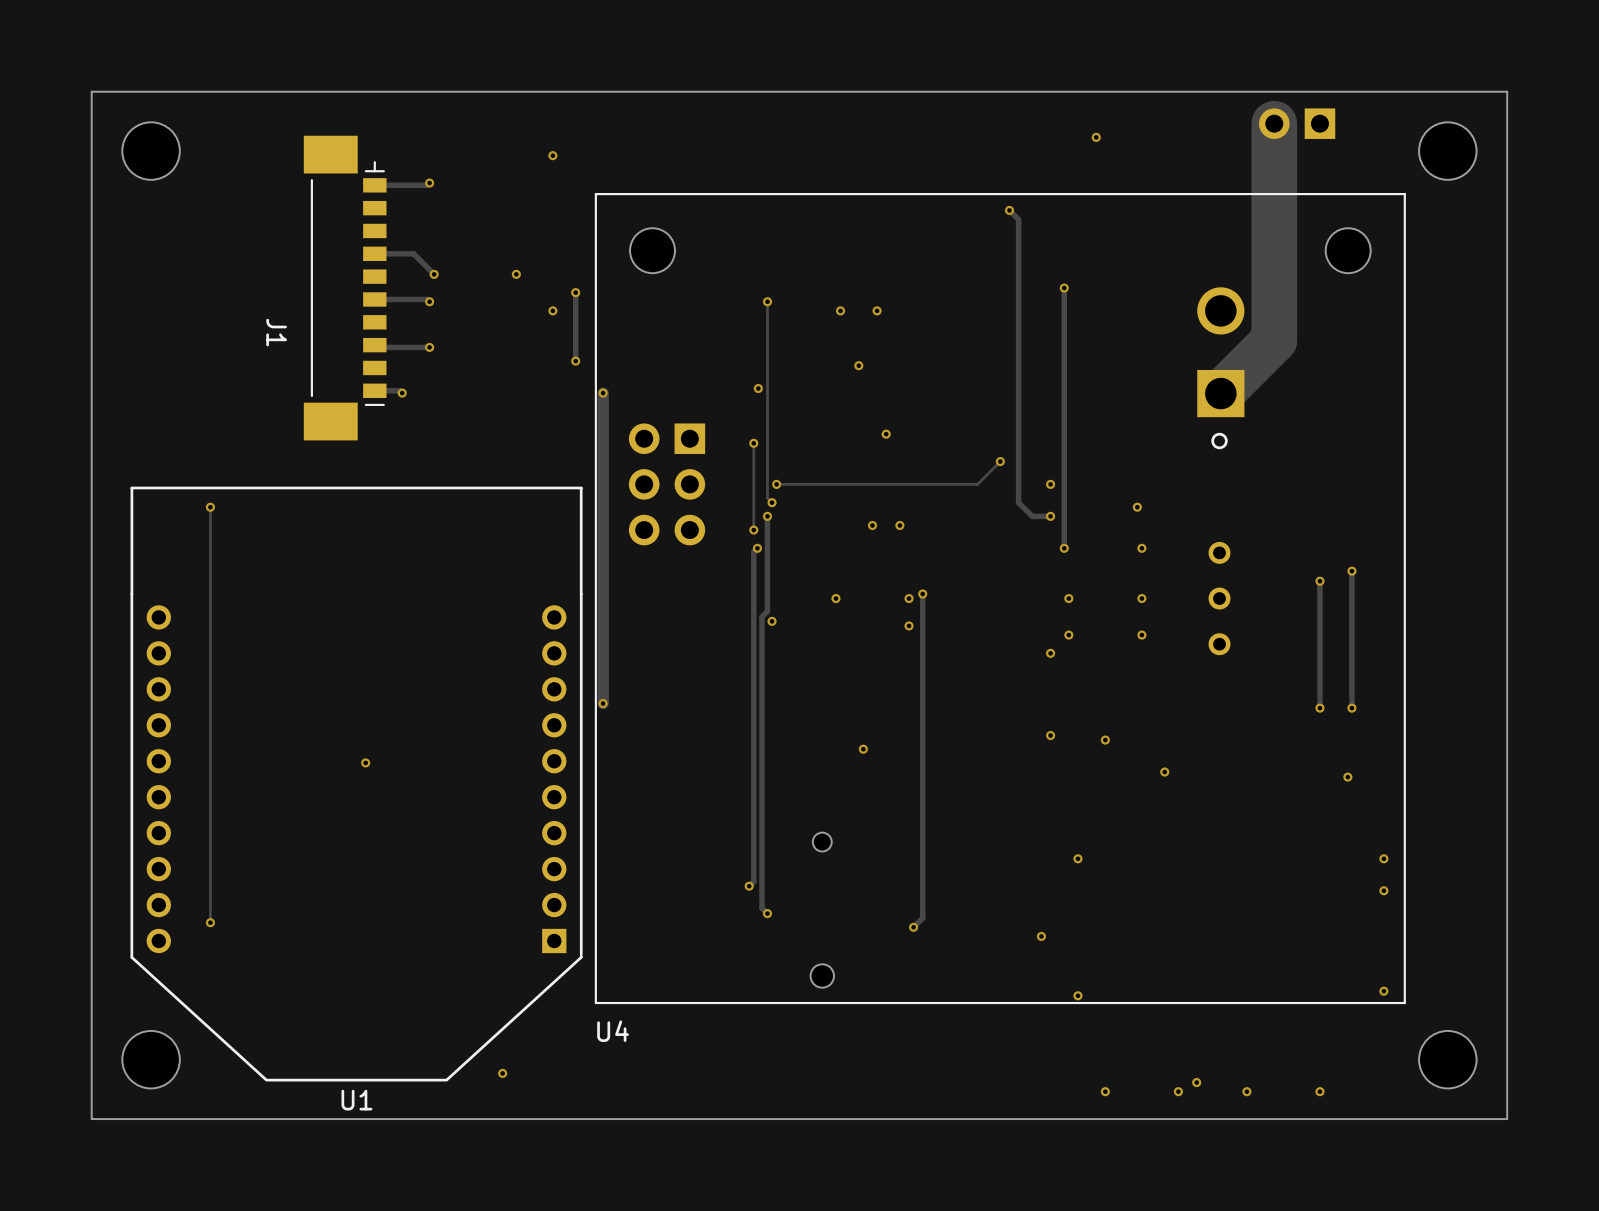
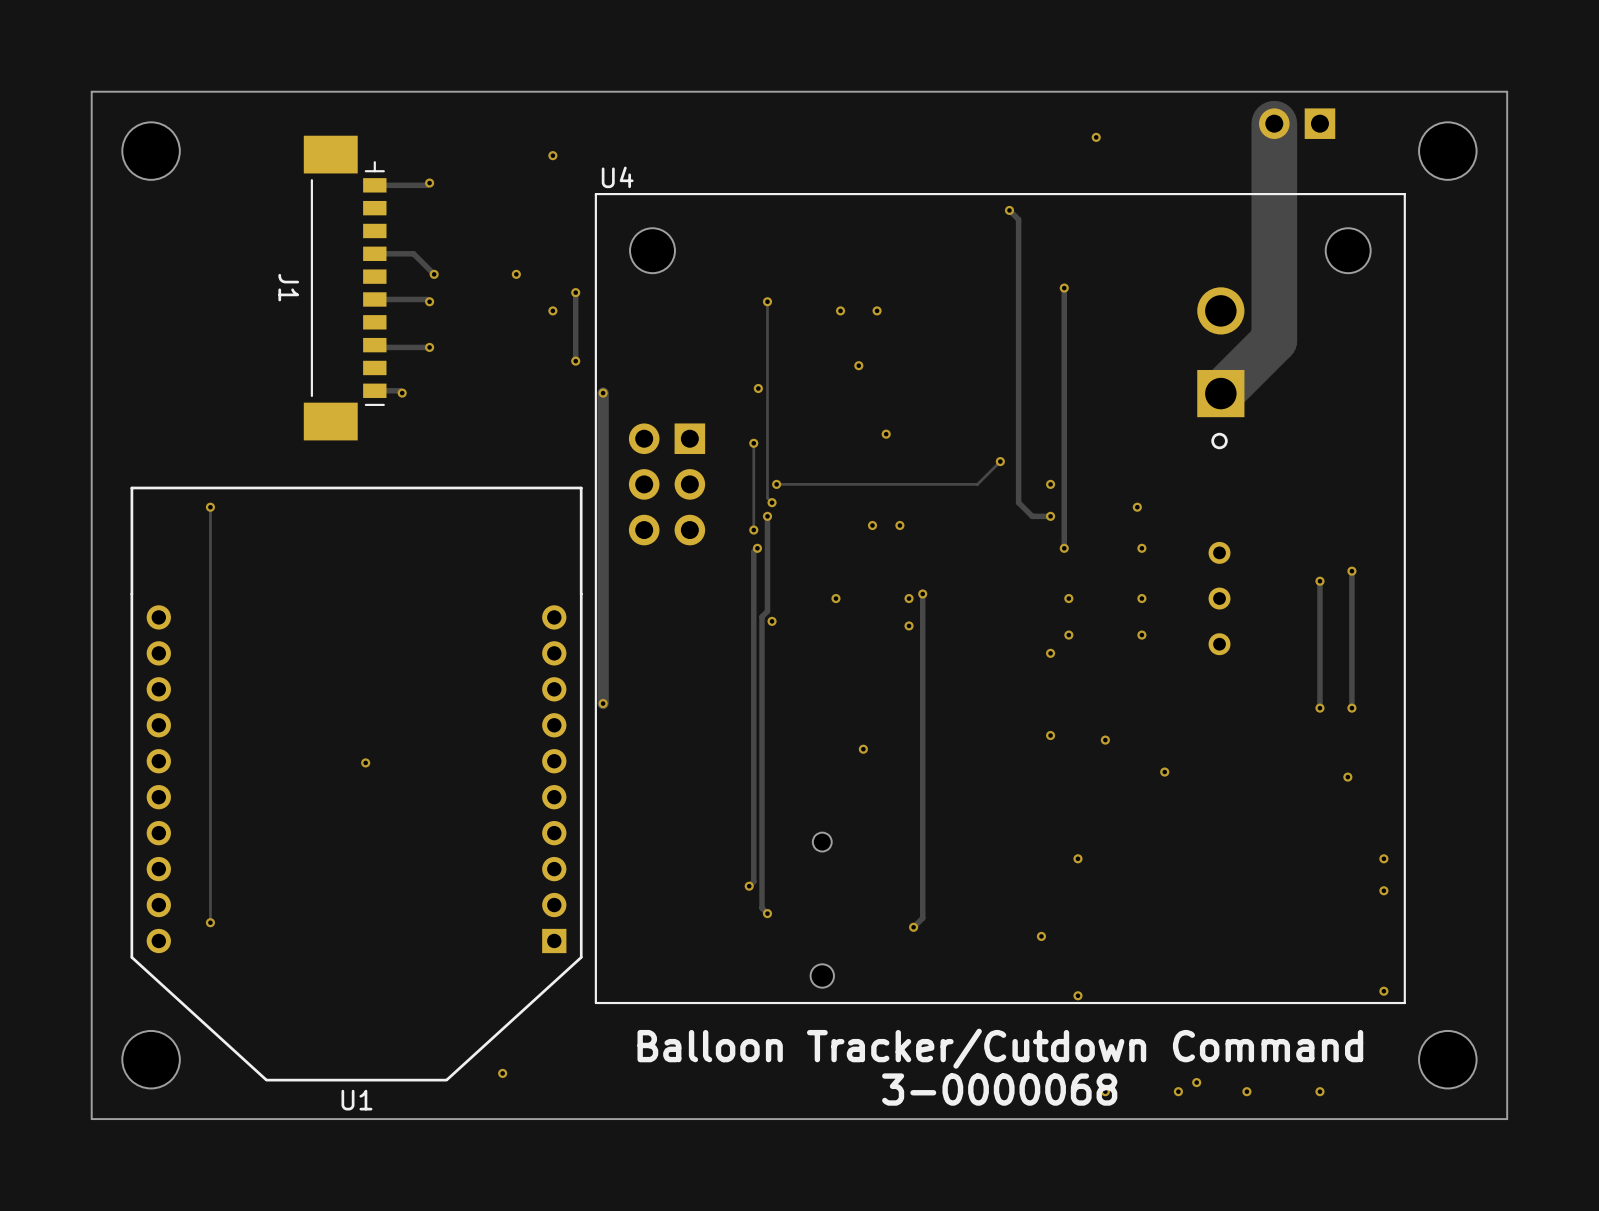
J1 name position: J1 (276, 332) -> J1 (288, 287)
U4 name position: U4 (613, 1031) -> U4 (617, 177)
text: none -> Balloon Tracker/Cutdown Command (1000, 1048)
text: none -> 3-0000068 (999, 1089)

